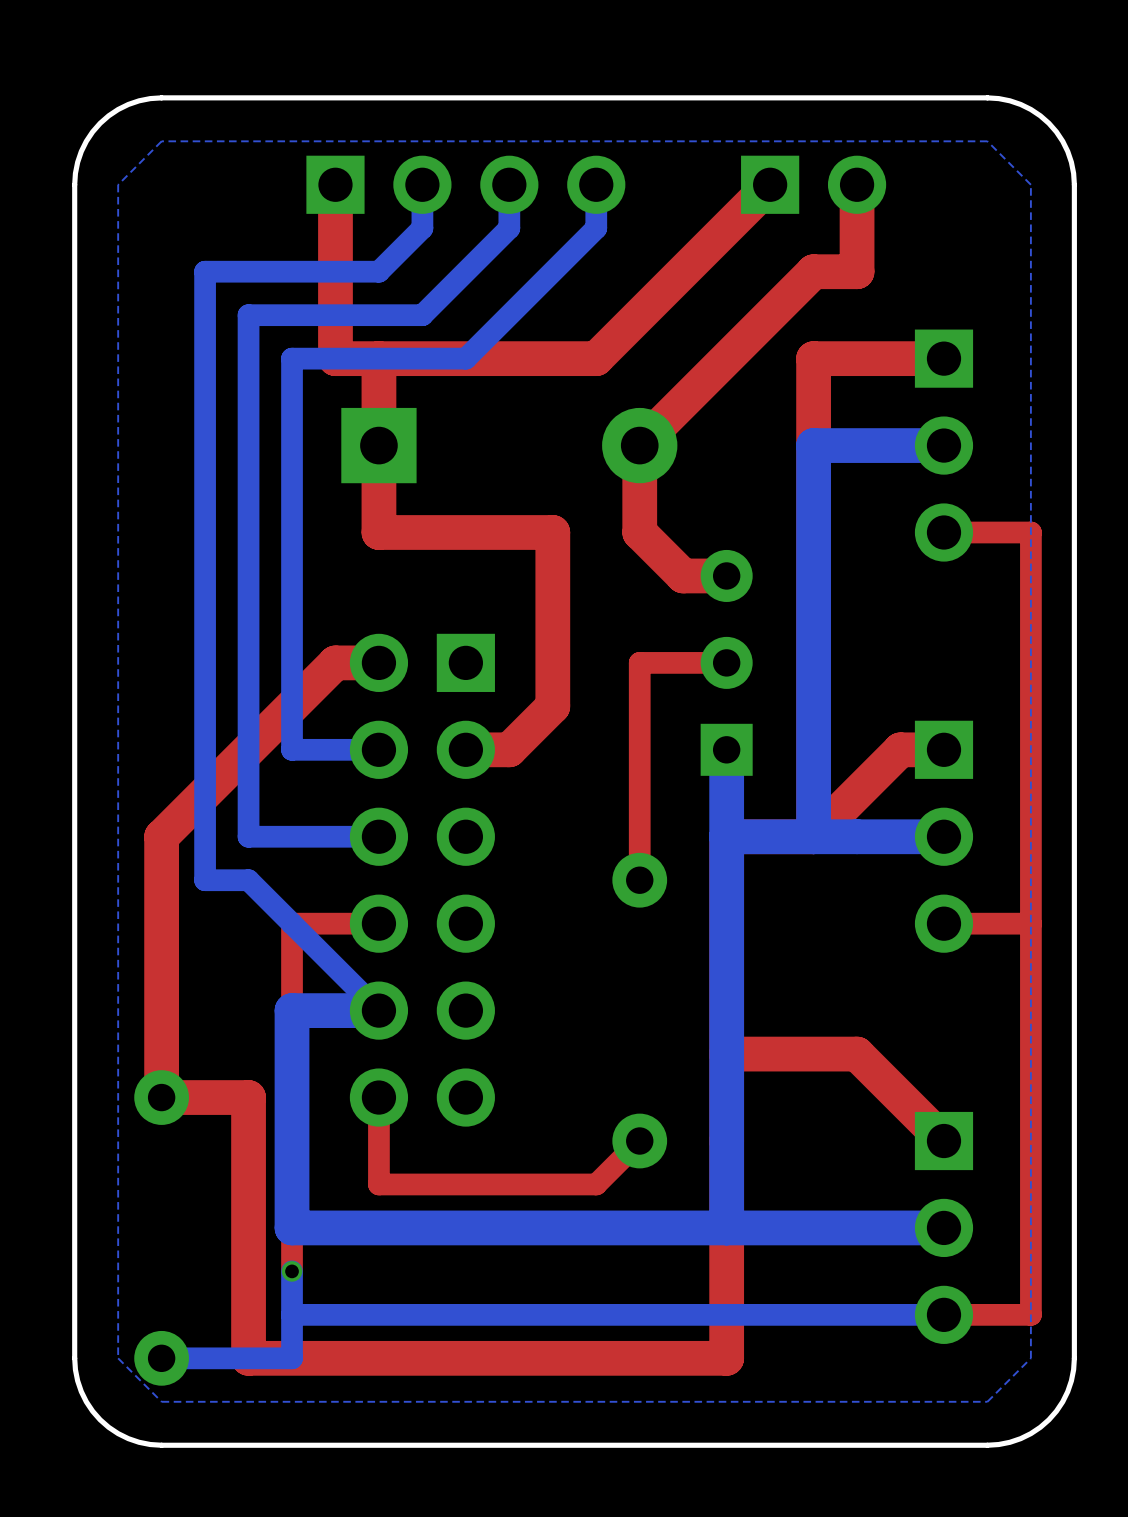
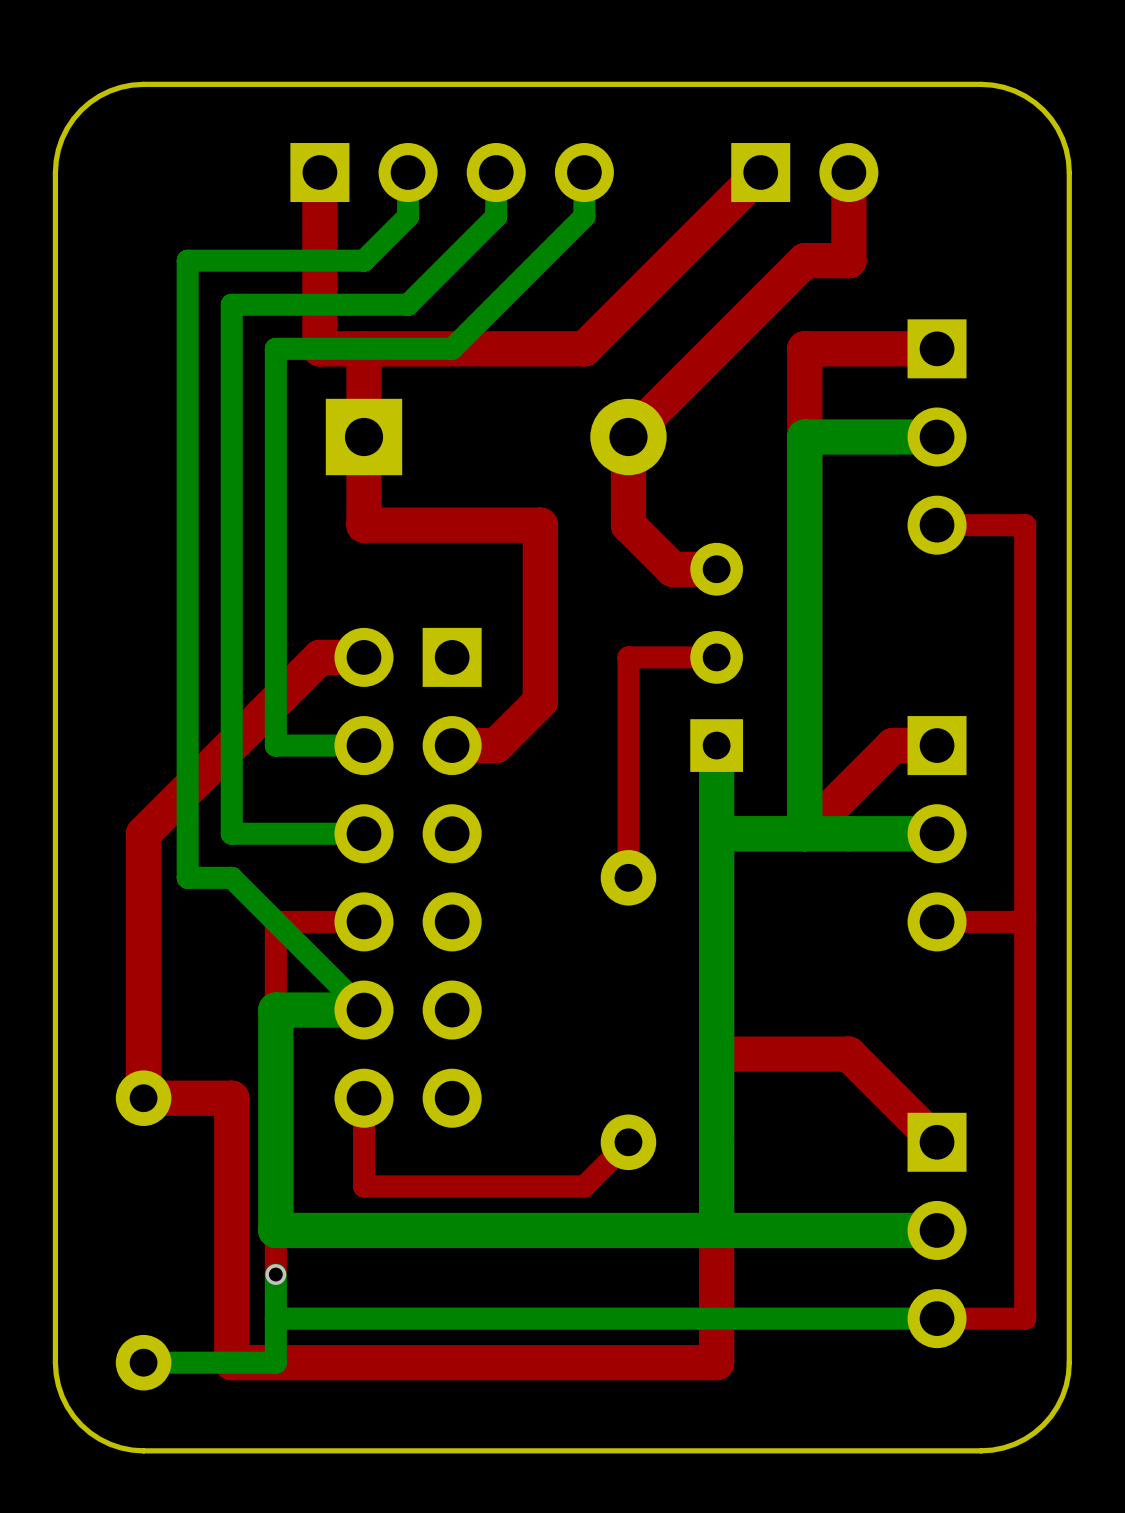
bottom zone outline: (987, 141) (1030, 184) (1030, 1358) (987, 1401) (161, 1401) (118, 1358) (118, 184) (161, 141) (987, 141) -> none

